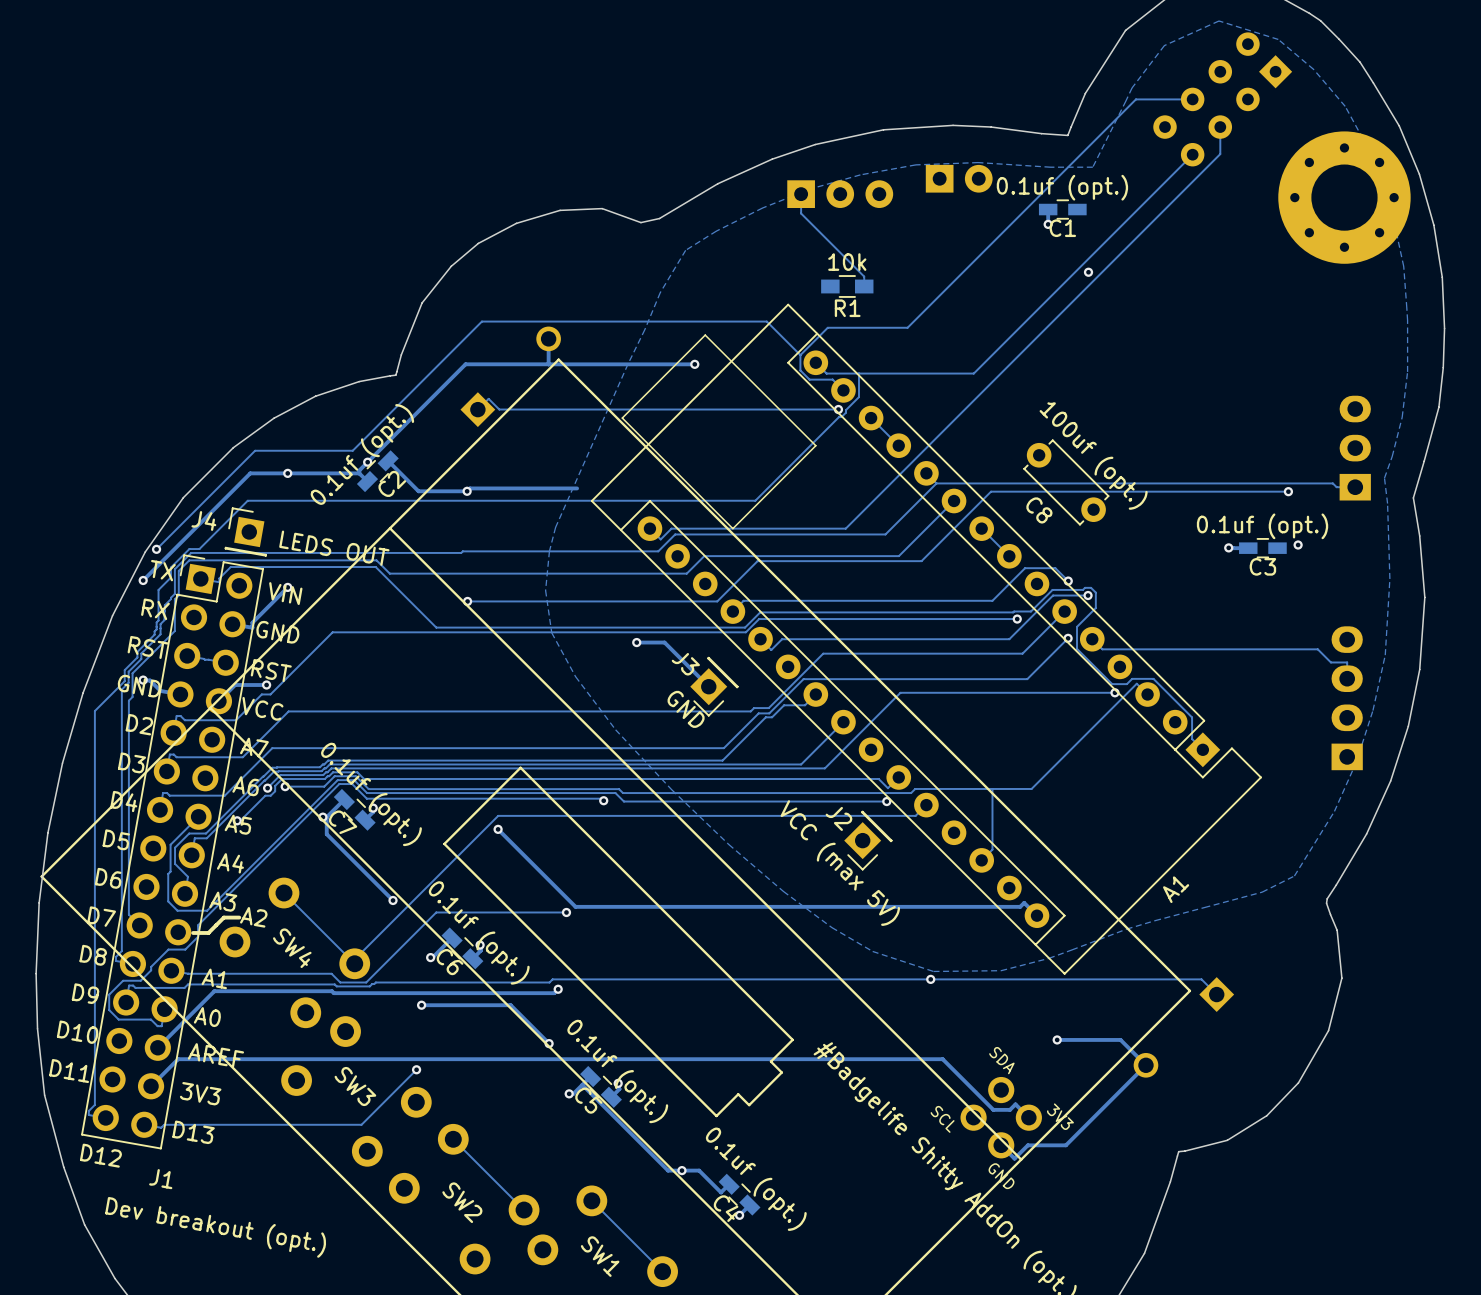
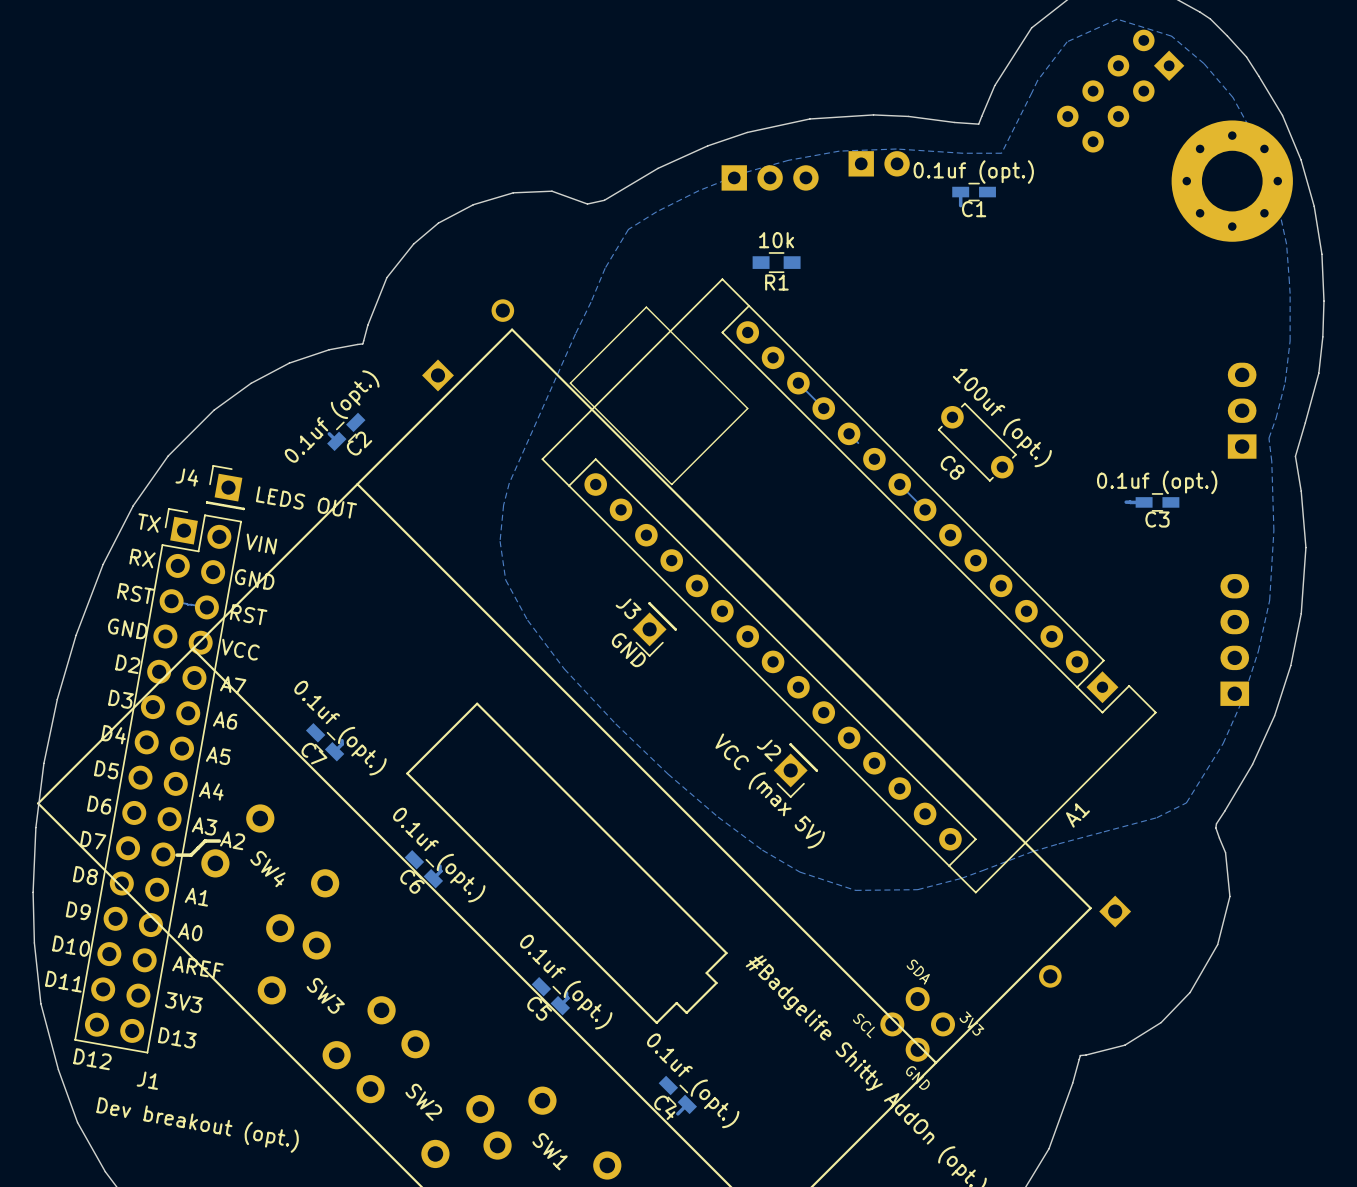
track: (1192, 99) (1135, 99) (907, 327) (827, 327) (800, 355) -> none
track: (1220, 127) (1220, 154) (845, 528) (671, 528) (660, 539) (649, 528) -> none
track: (1192, 154) (973, 373) (826, 373) (815, 362) -> none
track: (801, 194) (801, 213) (864, 276) (864, 286) -> none
via: (1048, 224) -> none
via: (1088, 272) -> none
track: (548, 338) (548, 364) (465, 364) (359, 470) (359, 473) (250, 473) (143, 580) -> none
track: (800, 355) (766, 321) (481, 321) (352, 450) (255, 450) (156, 549) -> none
track: (800, 355) (800, 370) (809, 379) (832, 379) (843, 390) -> none
track: (694, 364) (548, 364) -> none
via: (694, 364) -> none
track: (858, 373) (858, 397) (846, 410) (846, 412) (839, 417) (755, 500) (247, 500) (199, 549) (189, 549) (170, 567) (170, 577) (158, 589) (158, 620) (154, 634) (137, 651) (137, 657) (124, 670) (124, 681) (94, 711) (94, 1104) (88, 1110) (88, 1115) (105, 1117) -> none
track: (838, 409) (499, 409) (488, 398) (477, 409) -> none
via: (838, 409) -> none
track: (388, 460) (418, 491) (467, 491) (469, 488) (577, 488) -> none
via: (367, 462) -> none
via: (287, 473) -> none
track: (1355, 487) (1336, 487) (1332, 483) (936, 483) (885, 534) (675, 534) (658, 551) (191, 552) (174, 569) (174, 593) (164, 605) (164, 620) (160, 624) (160, 634) (141, 653) (141, 659) (128, 671) (128, 682) (121, 689) (121, 951) (115, 956) (115, 961) (132, 963) -> none
via: (467, 491) -> none
track: (1288, 491) (991, 491) (921, 561) (757, 561) (717, 601) (467, 601) -> none
via: (1288, 491) -> none
track: (954, 500) (898, 556) (704, 556) (686, 573) (389, 573) (376, 560) (189, 560) (178, 570) (178, 595) (174, 599) (174, 631) (132, 673) (132, 697) (128, 700) (128, 914) (139, 925) -> none
via: (1298, 545) -> none
via: (1228, 547) -> none
via: (156, 549) -> none
track: (200, 578) (219, 582) (219, 578) (230, 567) (375, 567) (436, 627) (745, 627) (760, 612) (1030, 611) (1052, 589) (1082, 589) (1091, 587) (1095, 592) (1095, 608) (1077, 626) (1077, 648) (1112, 684) (1126, 684) (1132, 678) (1153, 678) (1192, 717) (1192, 739) (1202, 749) -> none
via: (143, 580) -> none
track: (1068, 581) (1055, 568) (1025, 568) (992, 600) (743, 600) (732, 611) -> none
via: (1068, 581) -> none
track: (287, 587) (252, 622) (252, 627) (232, 624) -> none
via: (287, 587) -> none
track: (1088, 595) (1053, 595) (1009, 639) (782, 639) (771, 650) (760, 639) -> none
via: (1088, 595) -> none
via: (467, 601) -> none
track: (1064, 611) (1022, 653) (823, 653) (768, 708) (754, 708) (750, 711) (288, 711) (242, 757) (176, 757) (173, 754) (169, 754) (166, 771) -> none
track: (1017, 619) (759, 619) (745, 632) (332, 632) (270, 694) (261, 694) (236, 720) (184, 720) (180, 716) (176, 716) (173, 732) -> none
via: (1017, 619) -> none
track: (1068, 638) (1027, 679) (803, 679) (769, 713) (758, 713) (723, 748) (272, 748) (224, 795) (169, 795) (163, 793) (160, 809) -> none
via: (1068, 638) -> none
track: (1092, 639) (1102, 649) (1317, 649) (1330, 662) (1347, 662) (1347, 678) -> none
track: (636, 642) (664, 642) (708, 686) -> none
via: (636, 642) -> none
track: (143, 680) (150, 680) (160, 690) (180, 694) -> none
via: (143, 680) -> none
track: (266, 685) (235, 685) (218, 701) -> none
via: (266, 685) -> none
track: (1114, 692) (900, 692) (824, 768) (331, 768) (323, 775) (280, 775) (267, 787) -> none
via: (1114, 692) -> none
track: (815, 694) (805, 705) (784, 705) (772, 717) (765, 717) (722, 760) (328, 760) (320, 767) (272, 767) (206, 833) (189, 833) (175, 847) (175, 863) (187, 876) (185, 893) -> none
track: (1147, 694) (1136, 683) (1031, 788) (915, 788) (911, 793) (622, 793) (619, 789) (368, 789) (355, 776) (334, 776) (324, 786) (285, 786) -> none
track: (843, 722) (801, 764) (329, 764) (321, 771) (274, 771) (206, 838) (194, 838) (191, 855) -> none
track: (898, 777) (887, 788) (878, 779) (364, 779) (357, 772) (333, 772) (324, 779) (282, 779) (275, 785) (275, 791) (270, 795) (265, 795) (240, 820) (237, 820) -> none
via: (285, 786) -> none
via: (267, 788) -> none
track: (992, 788) (992, 849) (981, 860) -> none
track: (344, 799) (326, 817) -> none
track: (603, 800) (601, 798) (366, 798) (352, 784) (339, 784) (198, 925) (198, 936) (185, 949) (168, 949) (140, 980) (123, 980) (109, 994) (109, 1010) (118, 1019) (150, 1019) (157, 1026) (161, 1026) (164, 1009) -> none
via: (603, 800) -> none
track: (886, 801) (623, 801) (615, 793) (367, 793) (354, 780) (337, 780) (207, 910) (177, 910) (168, 901) (170, 844) (198, 816) -> none
via: (886, 801) -> none
track: (926, 805) (915, 815) (498, 815) (354, 959) (354, 963) (283, 893) -> none
via: (373, 808) -> none
via: (322, 817) -> none
track: (326, 817) (326, 834) (393, 900) -> none
via: (237, 820) -> none
track: (498, 829) (575, 906) (1020, 906) (1024, 902) (1036, 915) -> none
via: (498, 829) -> none
via: (393, 900) -> none
track: (566, 912) (436, 912) (366, 982) (340, 982) (331, 973) (188, 973) (171, 970) -> none
via: (566, 912) -> none
track: (452, 938) (430, 957) -> none
via: (480, 945) -> none
via: (430, 957) -> none
via: (930, 979) -> none
track: (558, 989) (554, 993) (214, 991) (157, 1047) -> none
via: (558, 989) -> none
track: (1216, 994) (1201, 979) (552, 979) (549, 982) (375, 982) (369, 986) (336, 986) (334, 984) (188, 984) (184, 987) (135, 987) (129, 985) (126, 1002) -> none
track: (421, 1005) (510, 1005) (549, 1043) -> none
via: (421, 1005) -> none
track: (1057, 1039) (1120, 1039) (1145, 1065) (1065, 1145) (1027, 1145) (1014, 1158) (1001, 1145) -> none
via: (1057, 1039) -> none
via: (549, 1043) -> none
track: (416, 1069) (361, 1124) (164, 1124) (161, 1127) (144, 1124) -> none
via: (416, 1069) -> none
track: (590, 1076) (573, 1093) (569, 1093) -> none
via: (618, 1083) -> none
track: (582, 1084) (668, 1170) (699, 1170) (721, 1192) (729, 1184) -> none
track: (151, 1086) (178, 1059) (942, 1059) (993, 1109) (1010, 1109) (1015, 1104) (1028, 1117) -> none
via: (569, 1093) -> none
track: (453, 1139) (524, 1210) -> none
via: (681, 1170) -> none
track: (591, 1200) (662, 1271) -> none
via: (739, 1215) -> none

